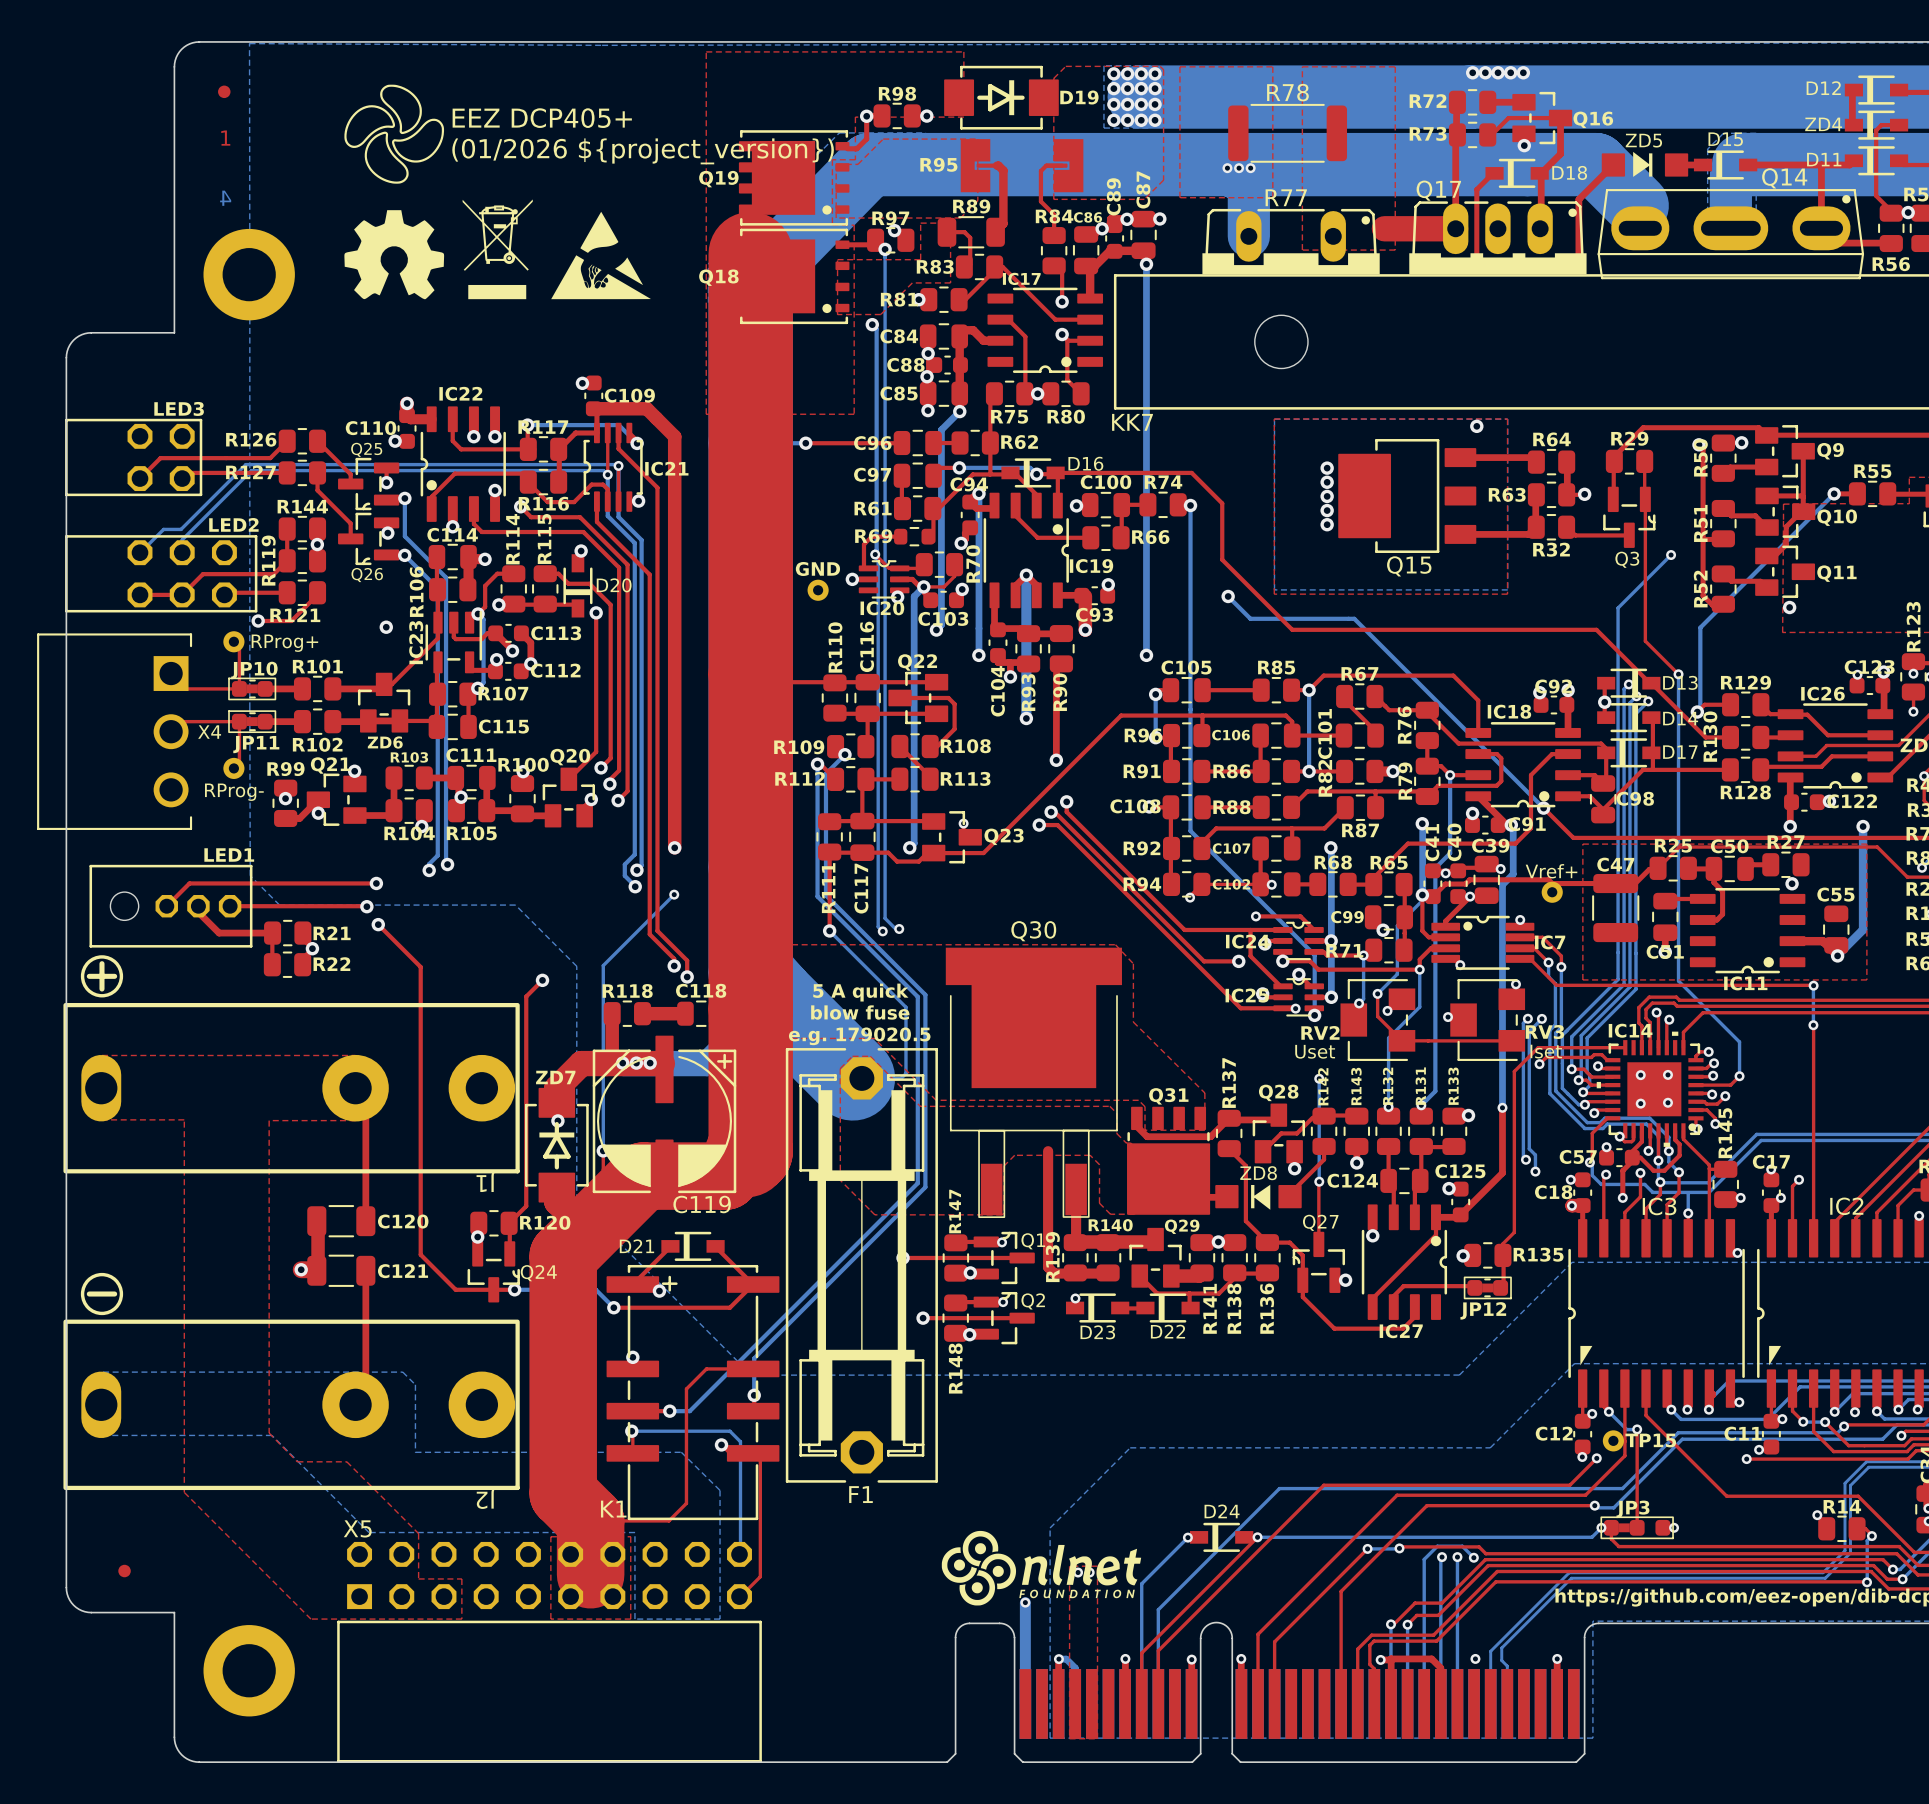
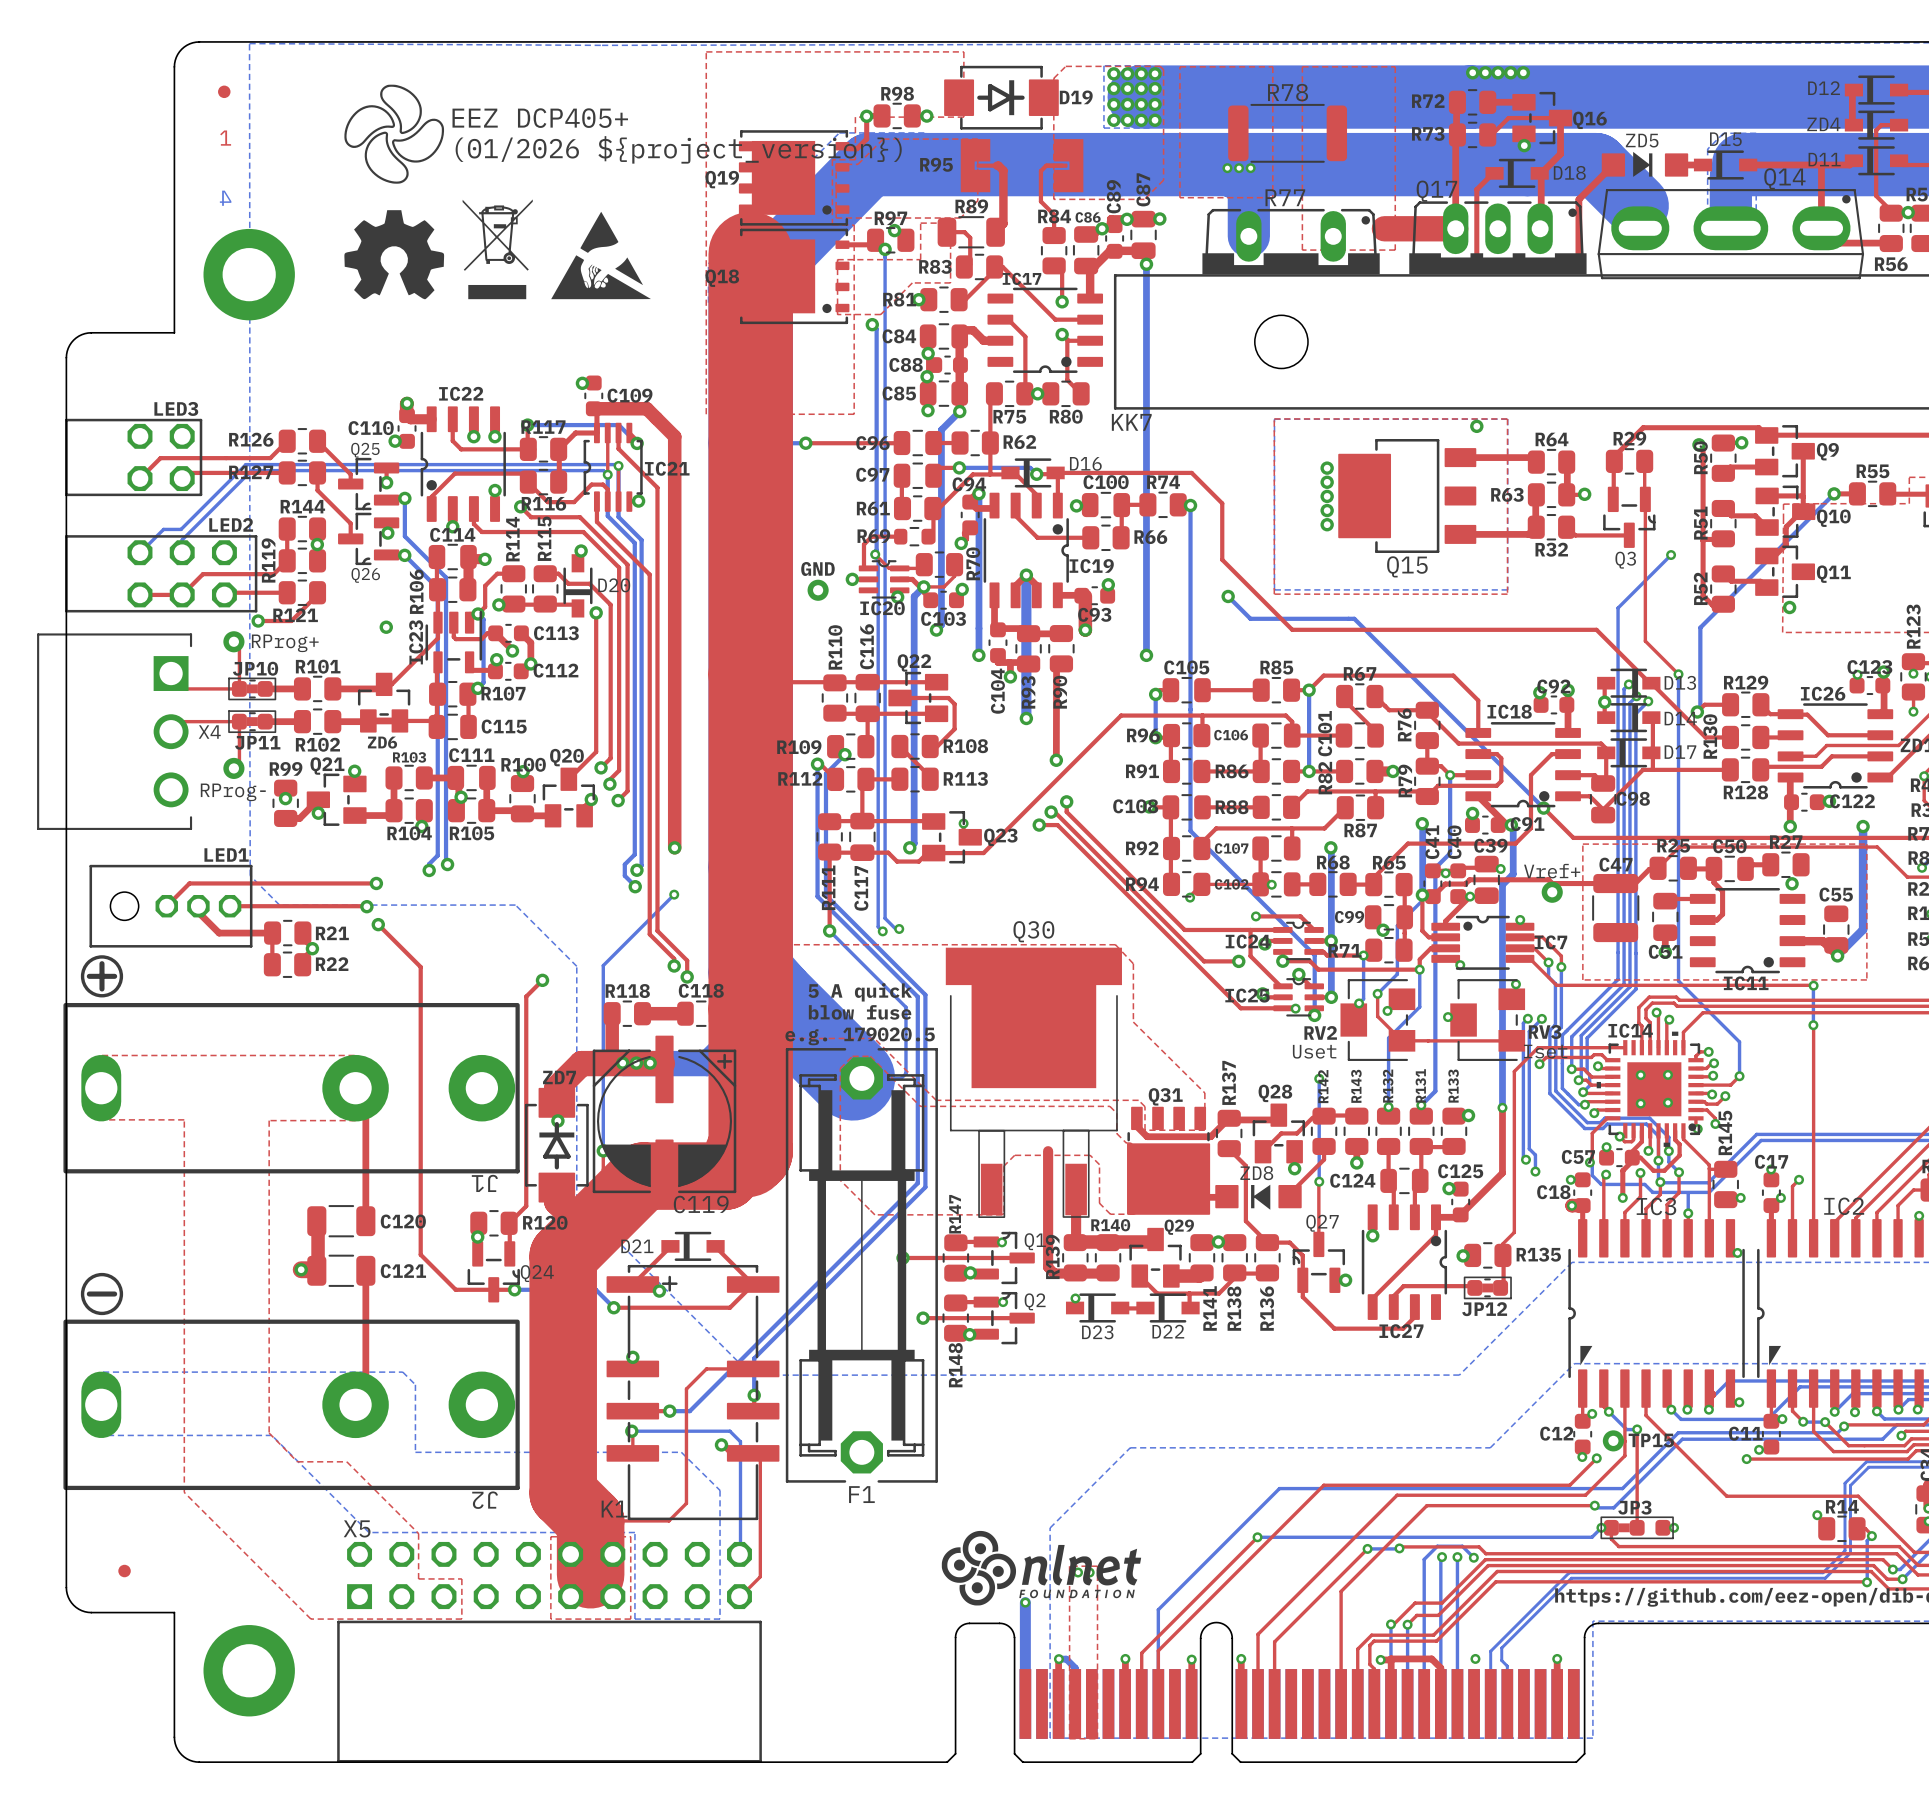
bottom track: (1187, 1537) (1141, 1583) (1141, 1703) -> none
via: (1187, 1537) -> none
D24: (1221, 1537) -> none

